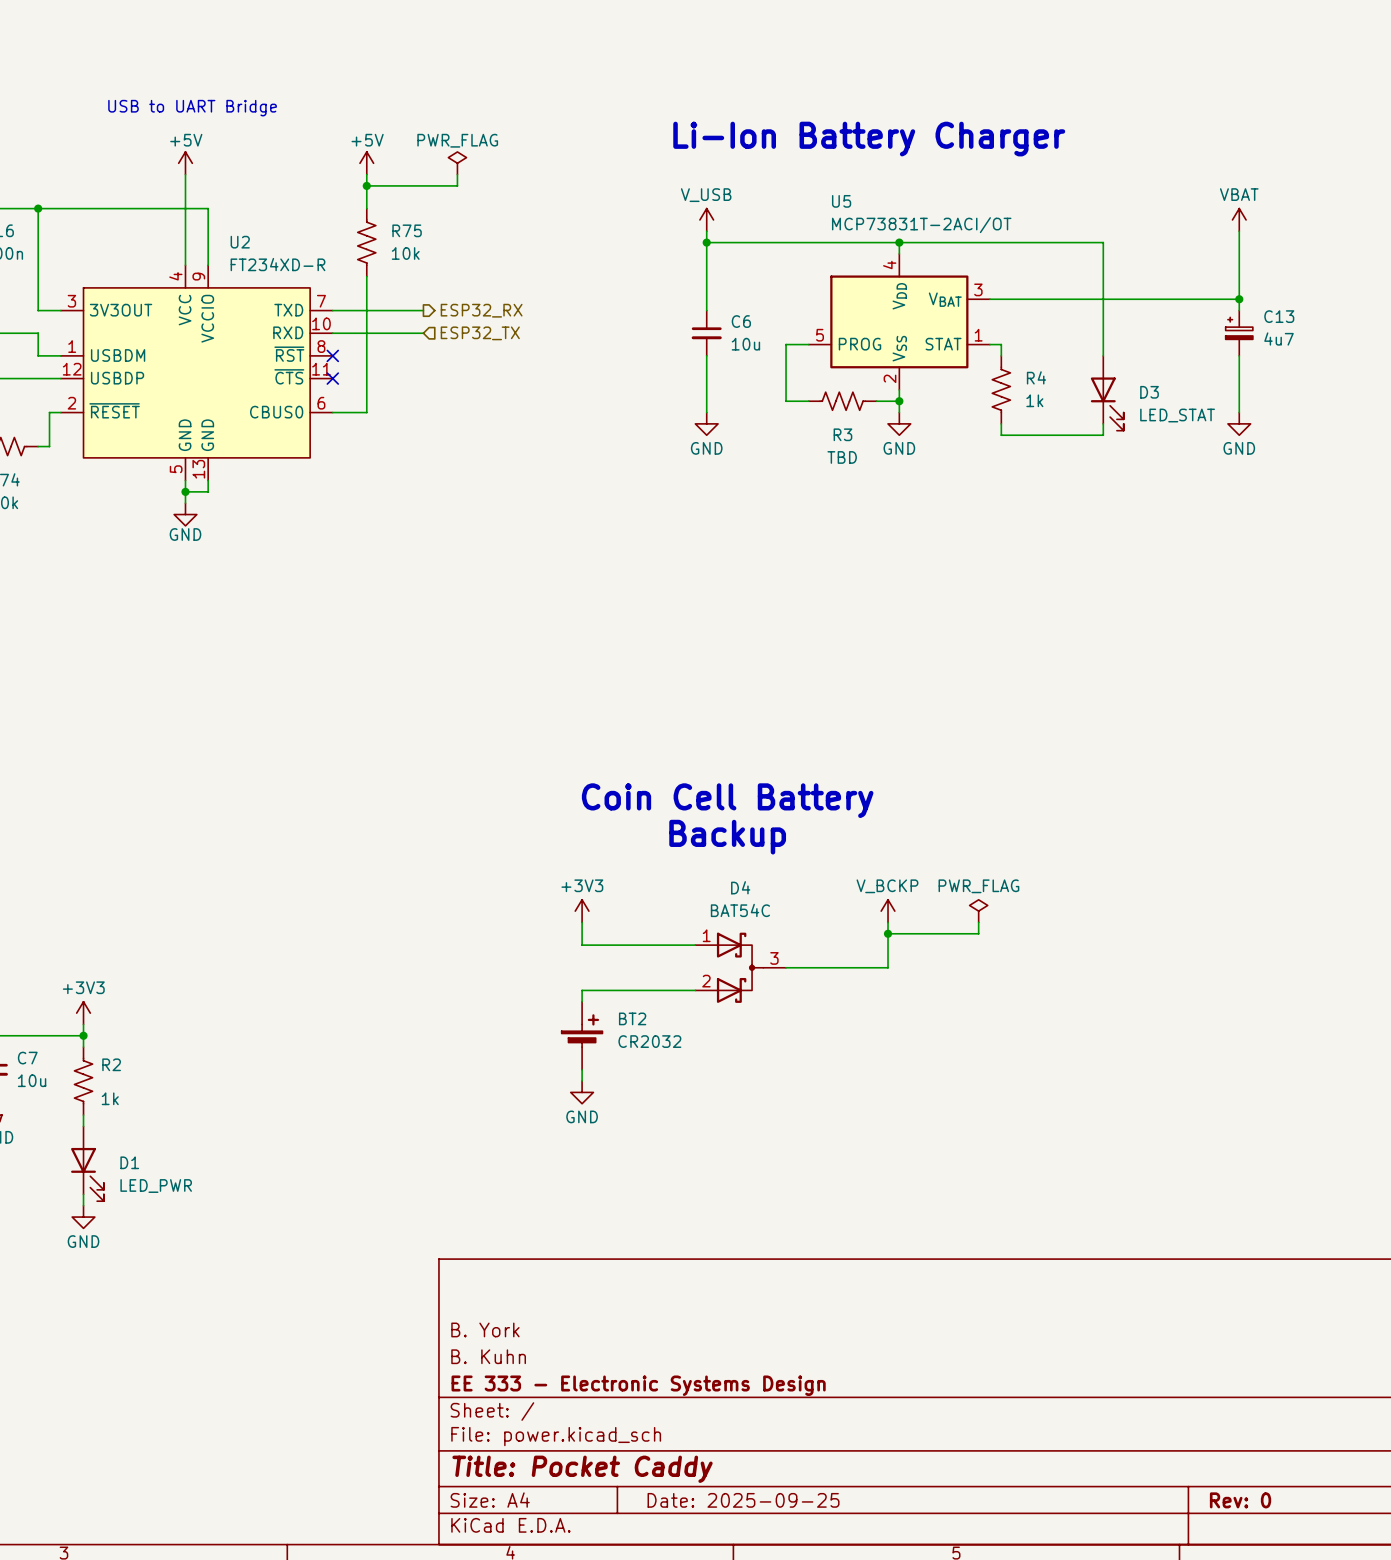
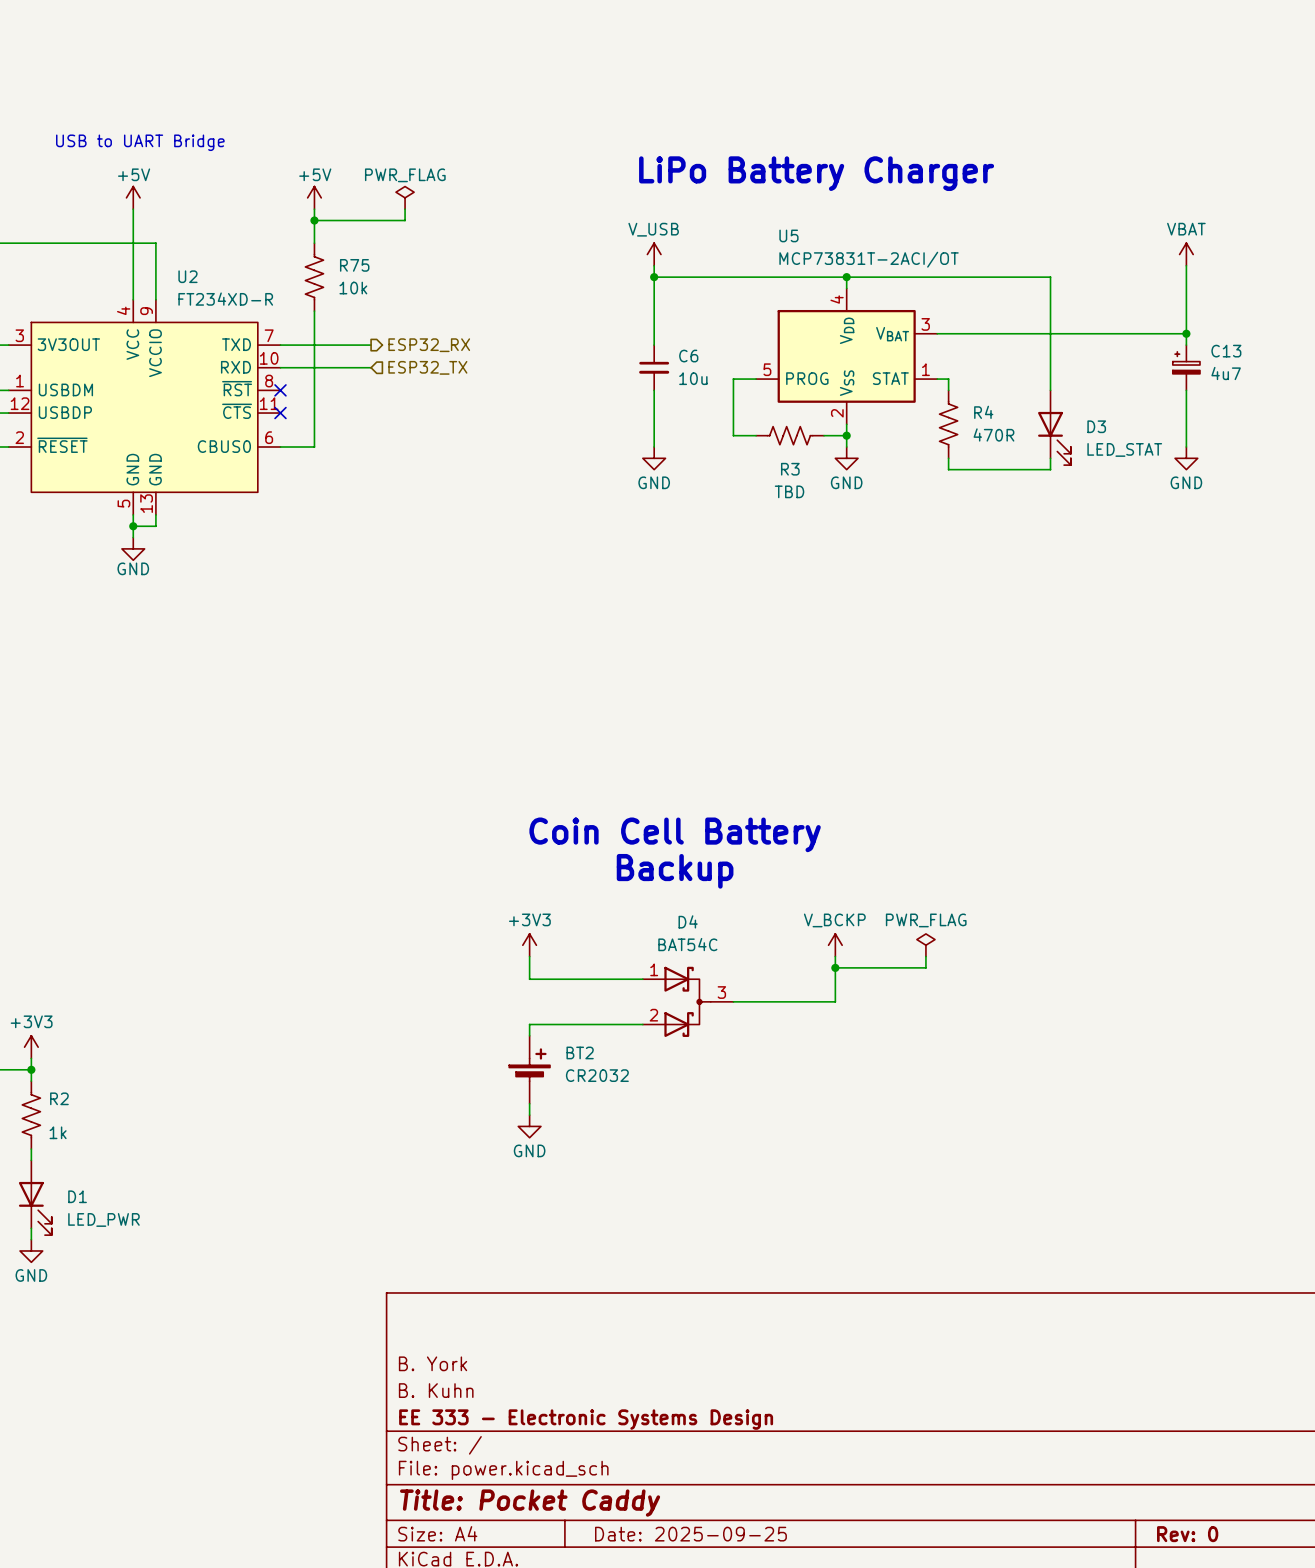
text: Li-Ion Battery Charger (869, 139) -> LiPo Battery Charger (816, 173)
R4 value: 1k (1034, 400) -> 470R (993, 434)

